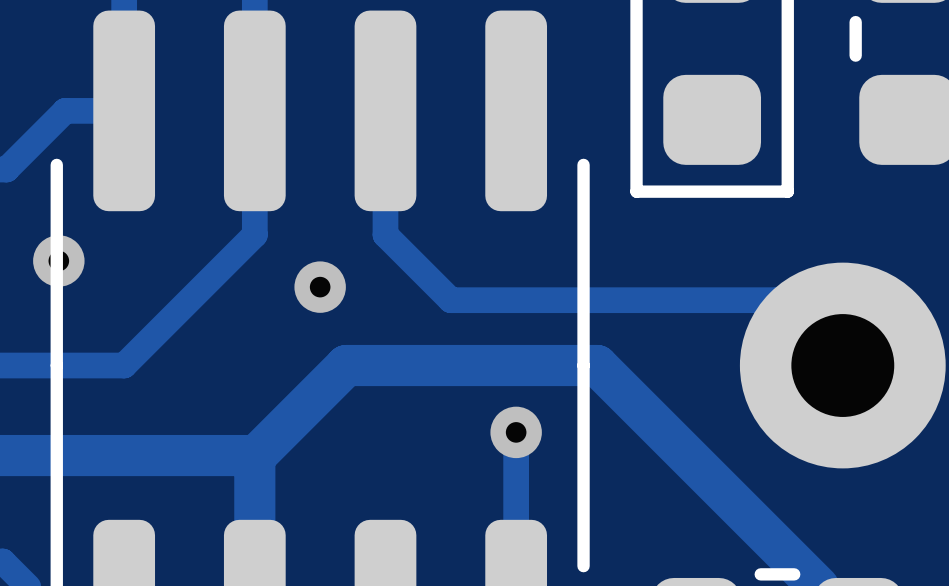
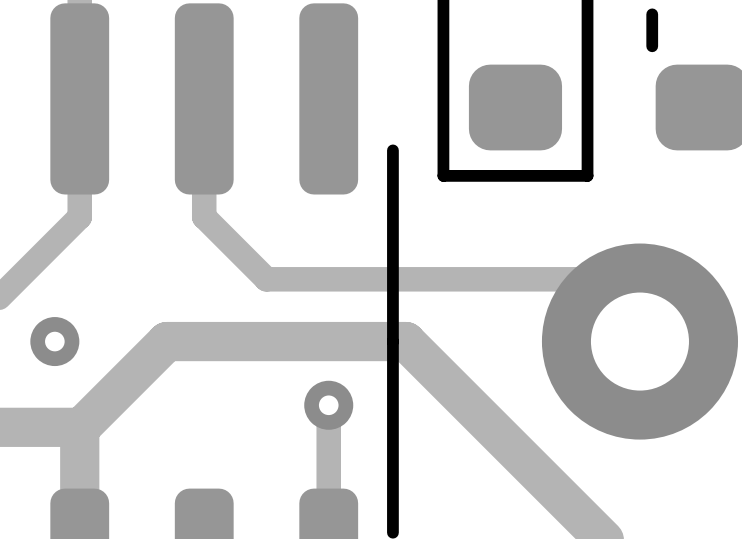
via position: (320, 287) -> (54, 341)

